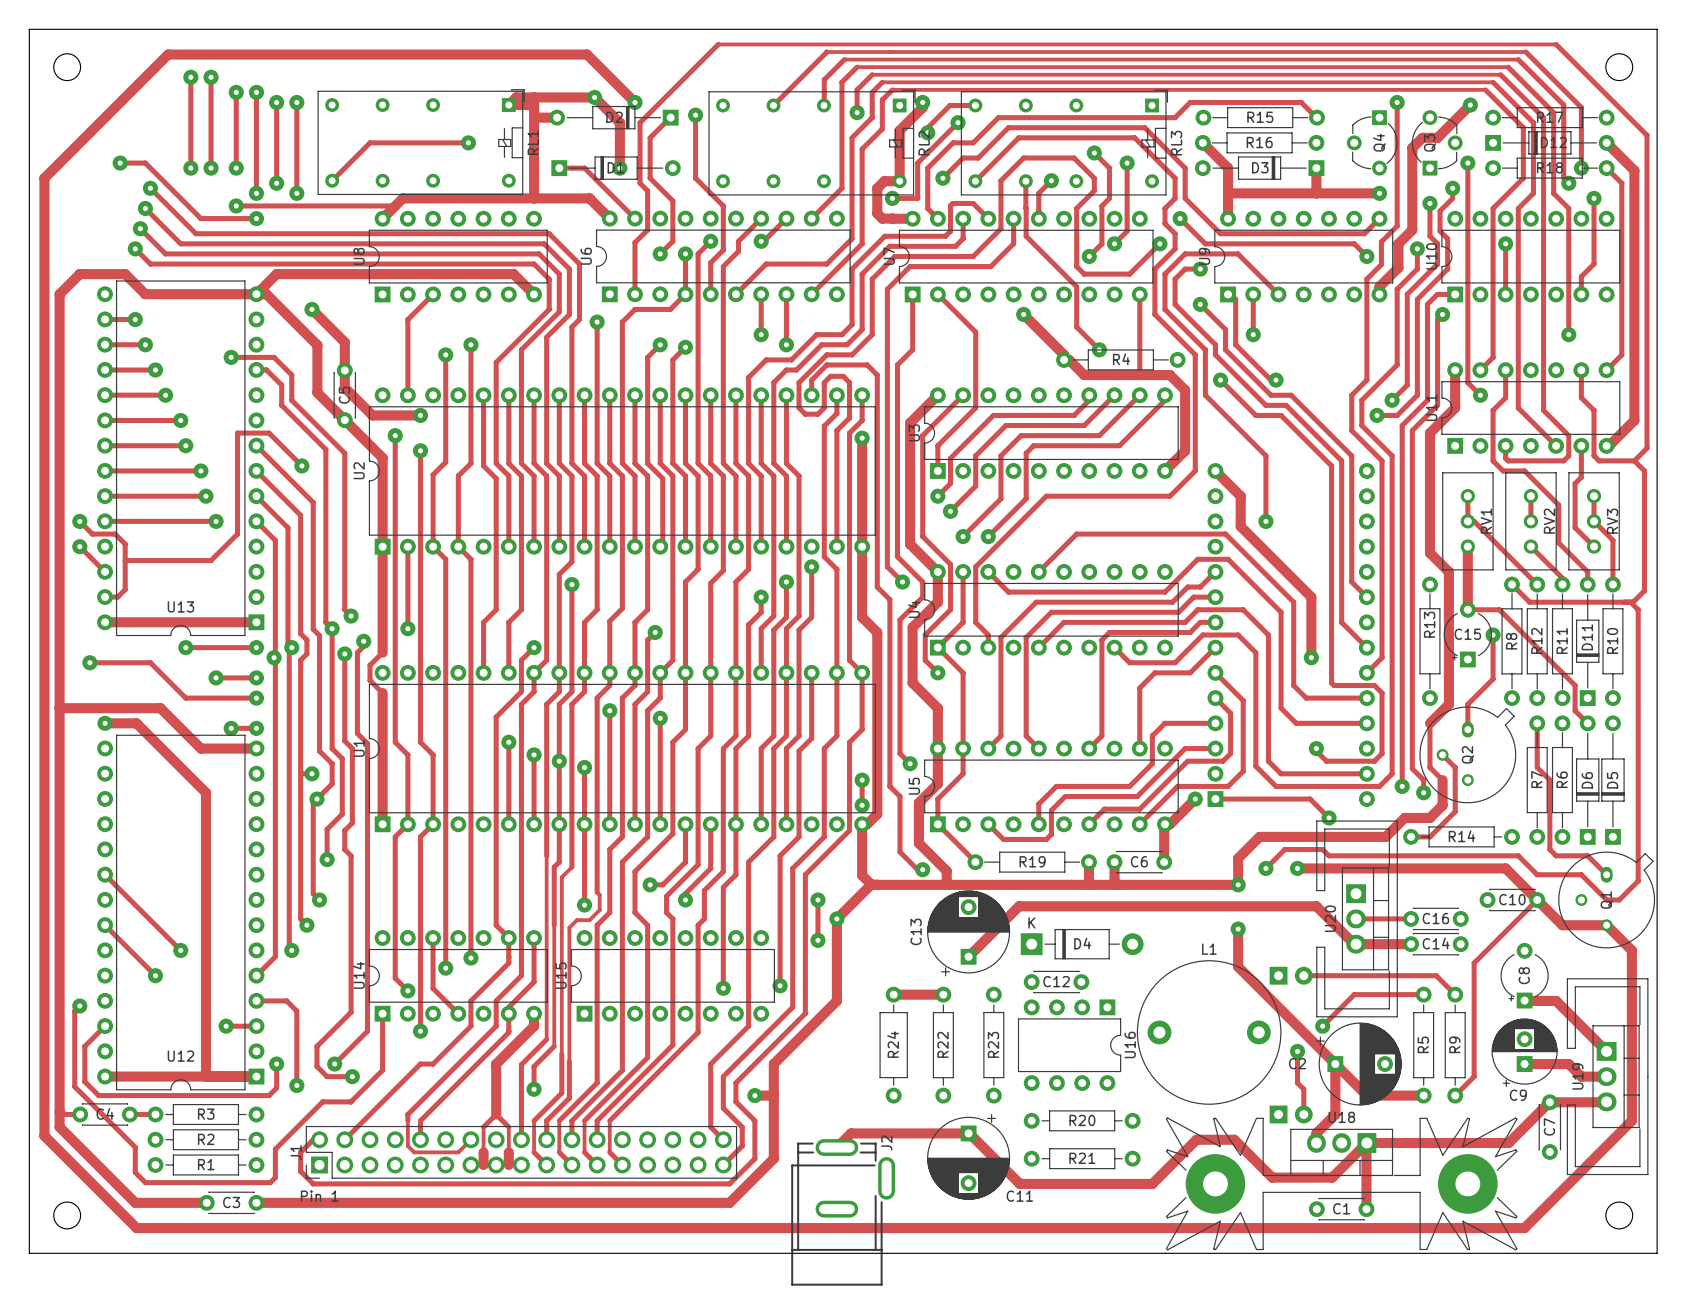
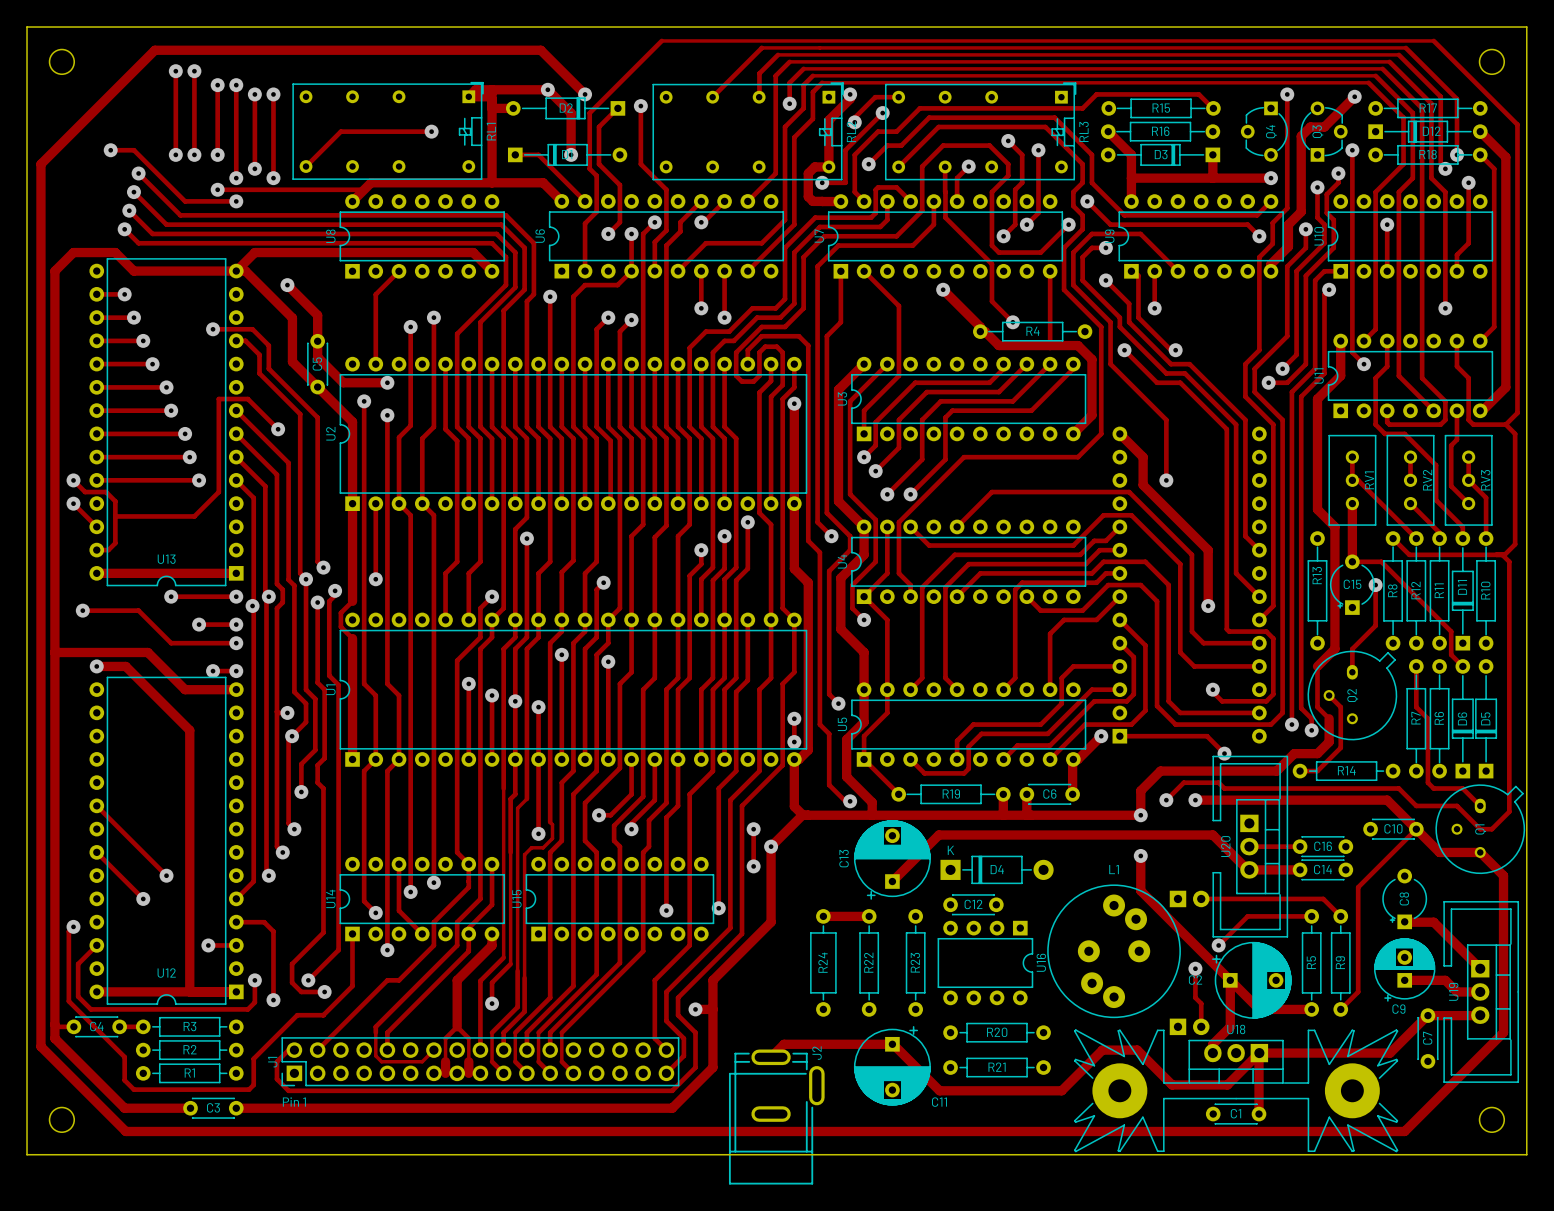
L1 footprint: [1136, 960, 1282, 1105] -> [1047, 884, 1181, 1018]

